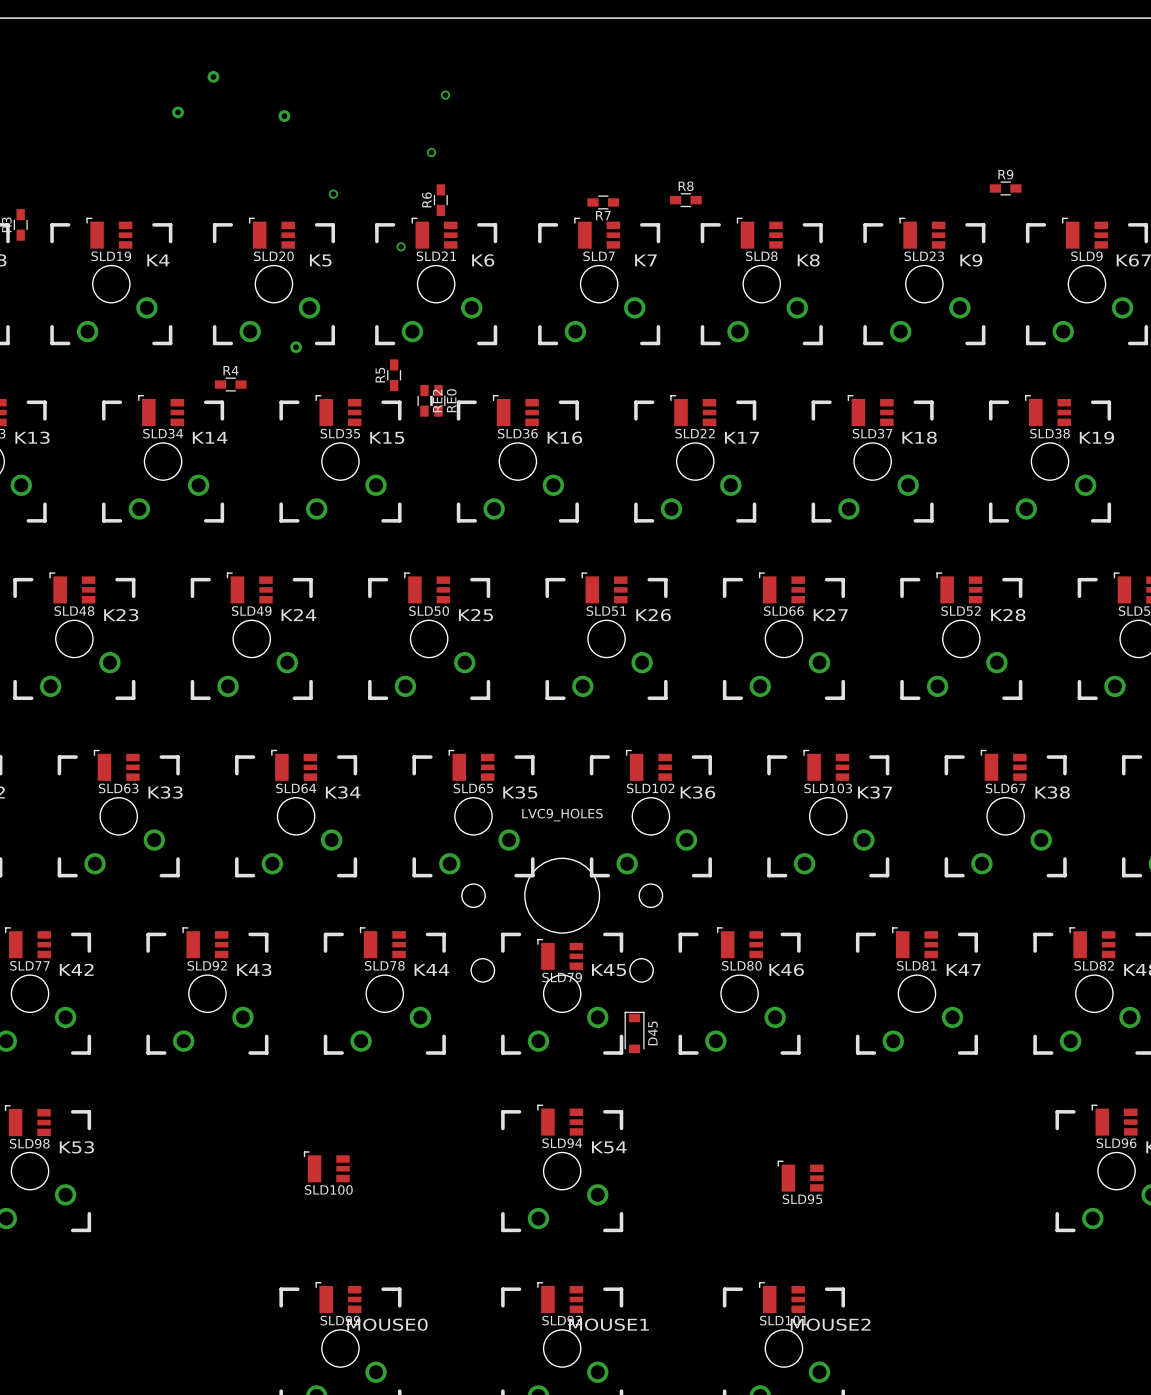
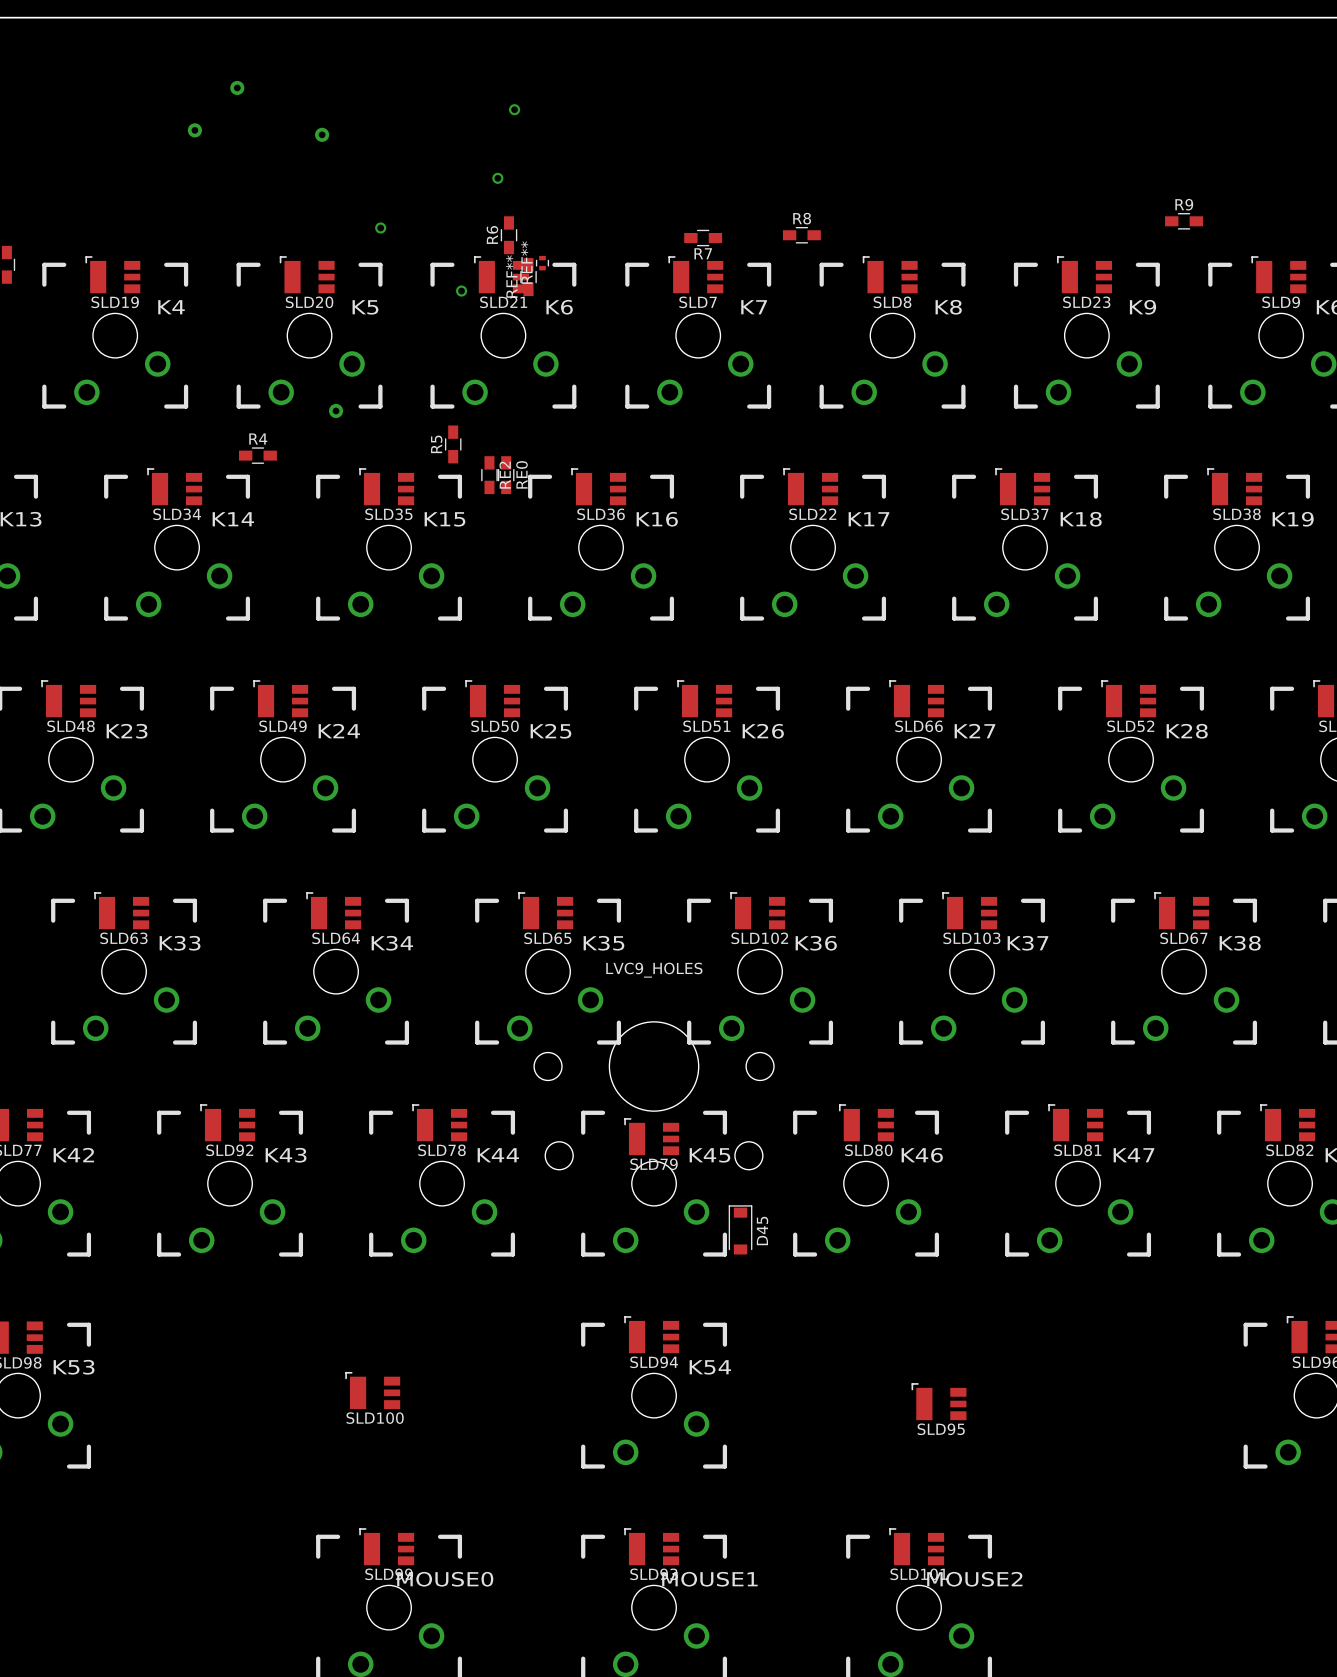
REF**: none -> (542, 263)
REF**: none -> (528, 277)

